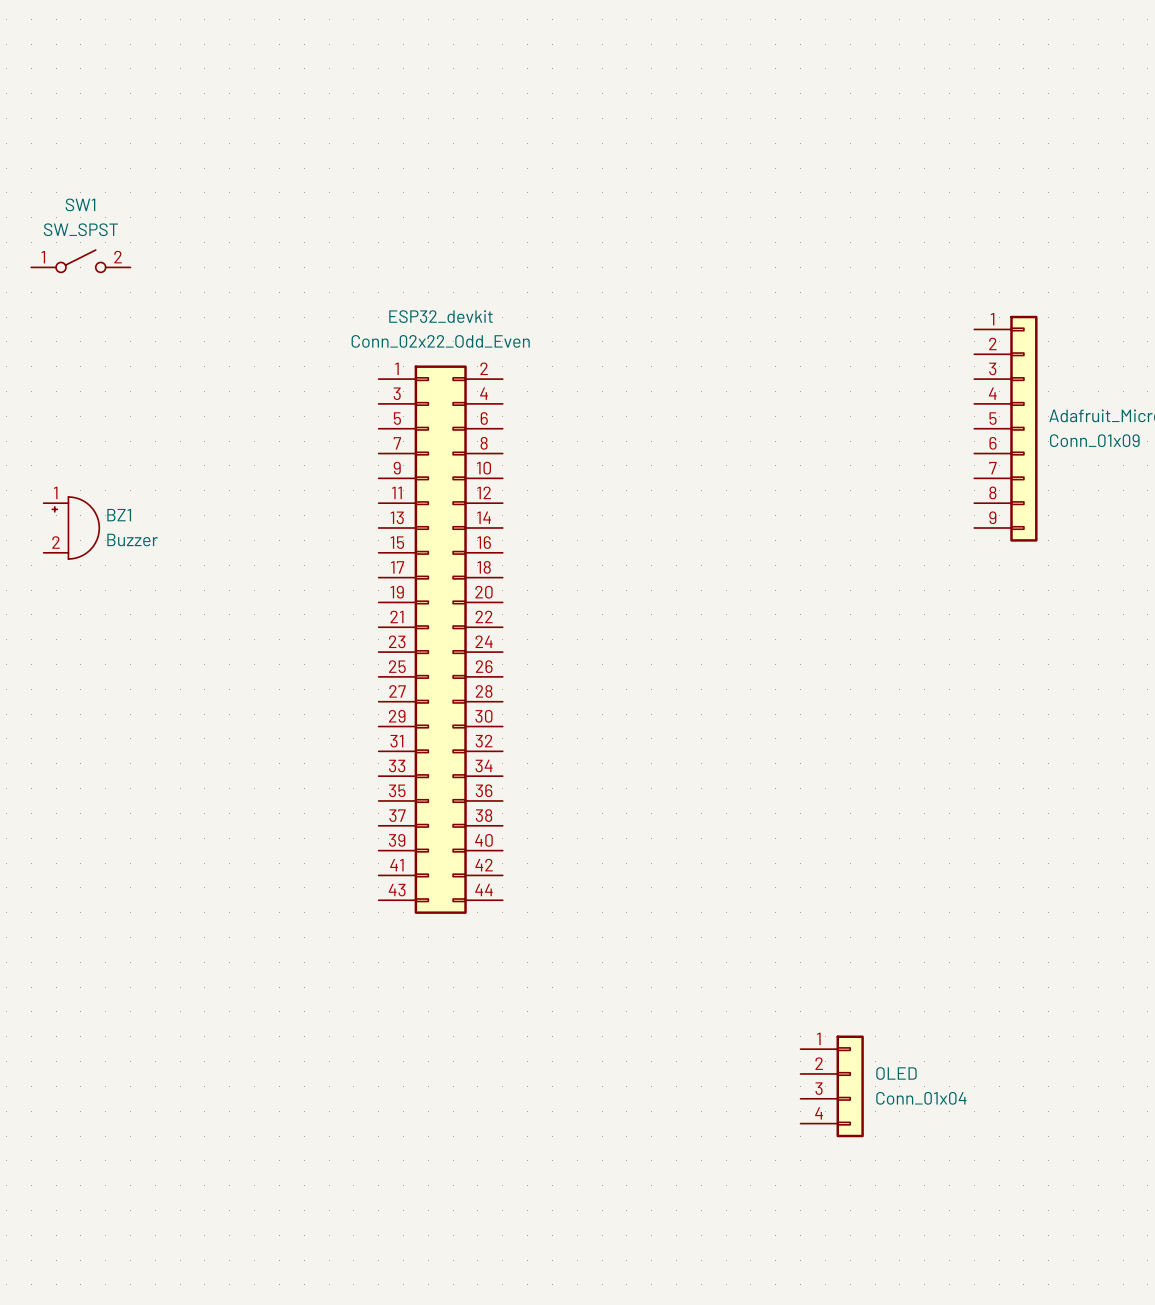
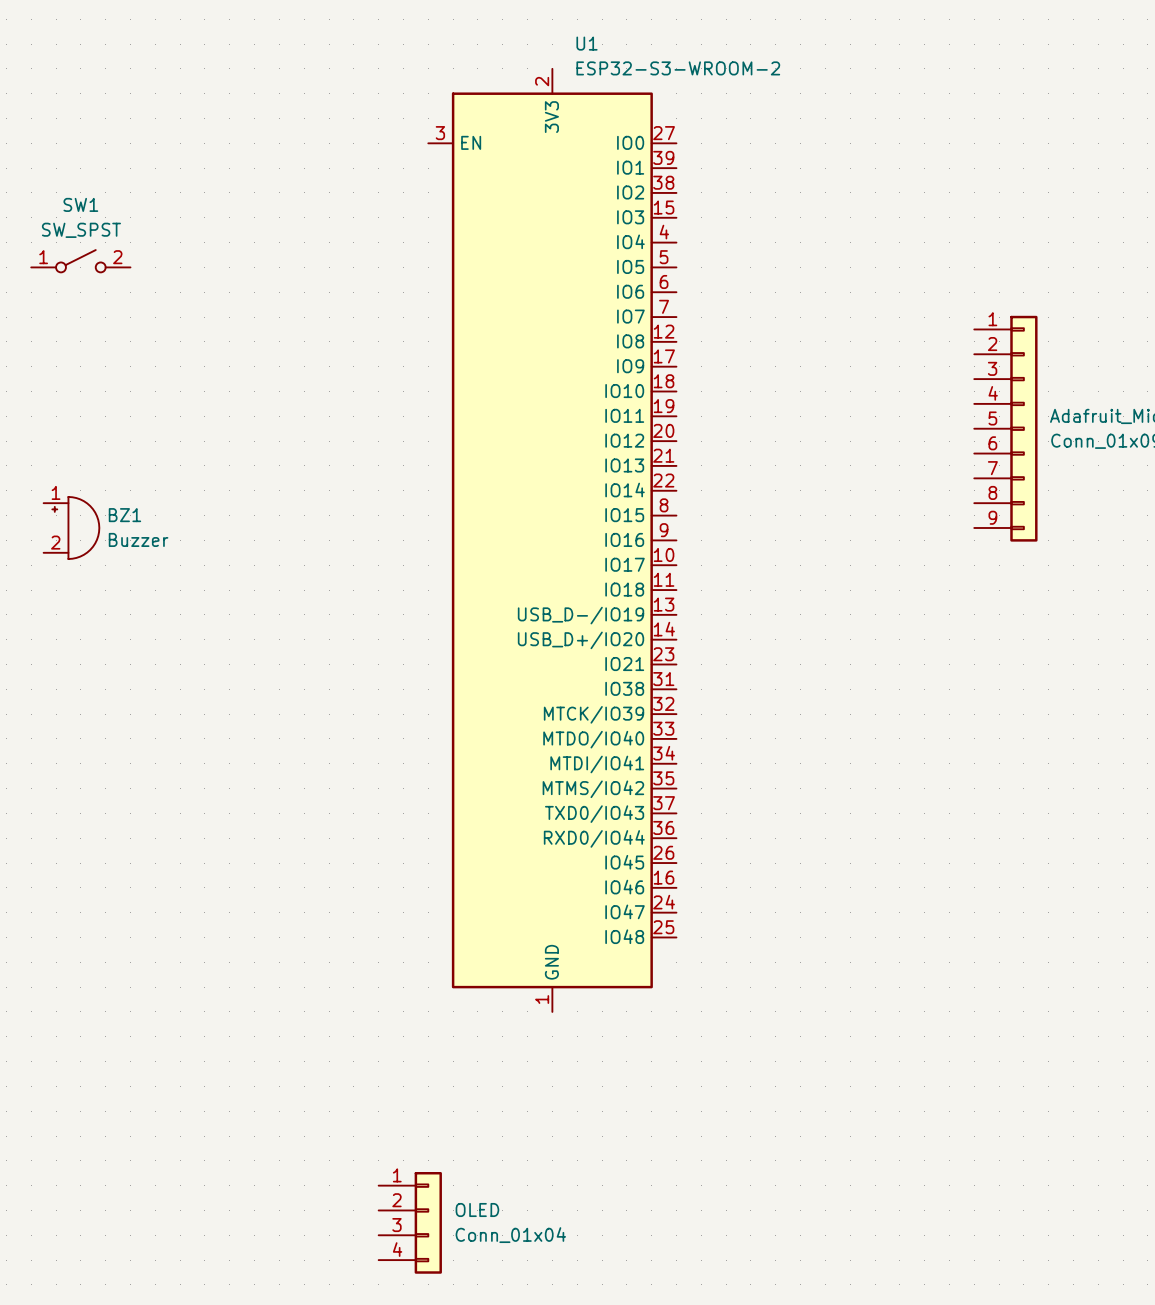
U1: none -> ESP32-S3-WROOM-2 (552, 540)
ESP32_devkit: Conn_02x22_Odd_Even (440, 639) -> none
OLED: Conn_01x04 (832, 1086) -> none
OLED: none -> Conn_01x04 (410, 1222)

